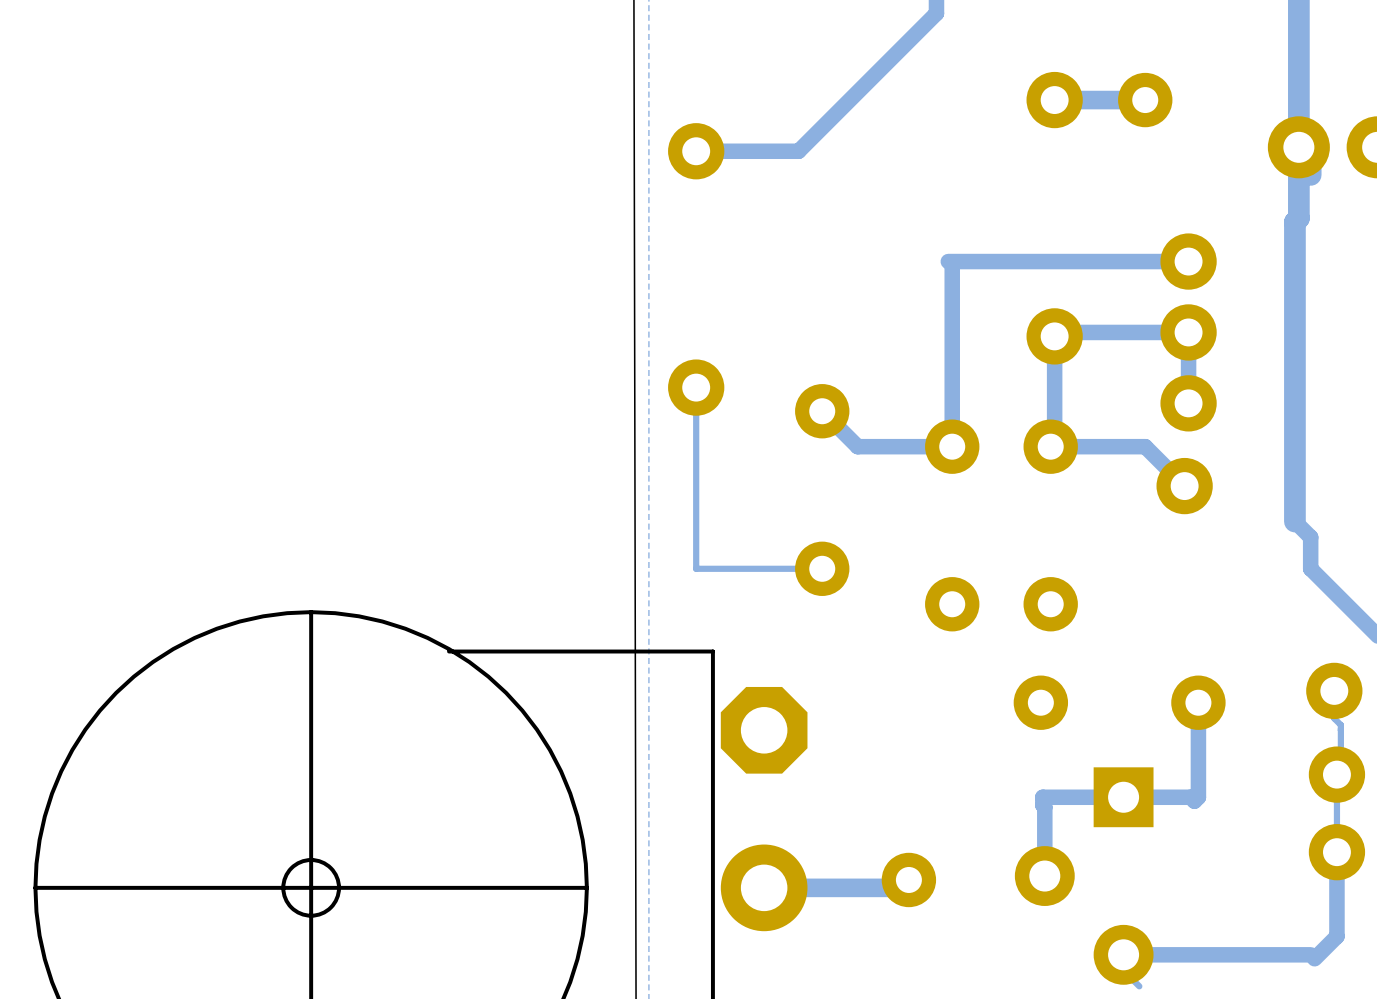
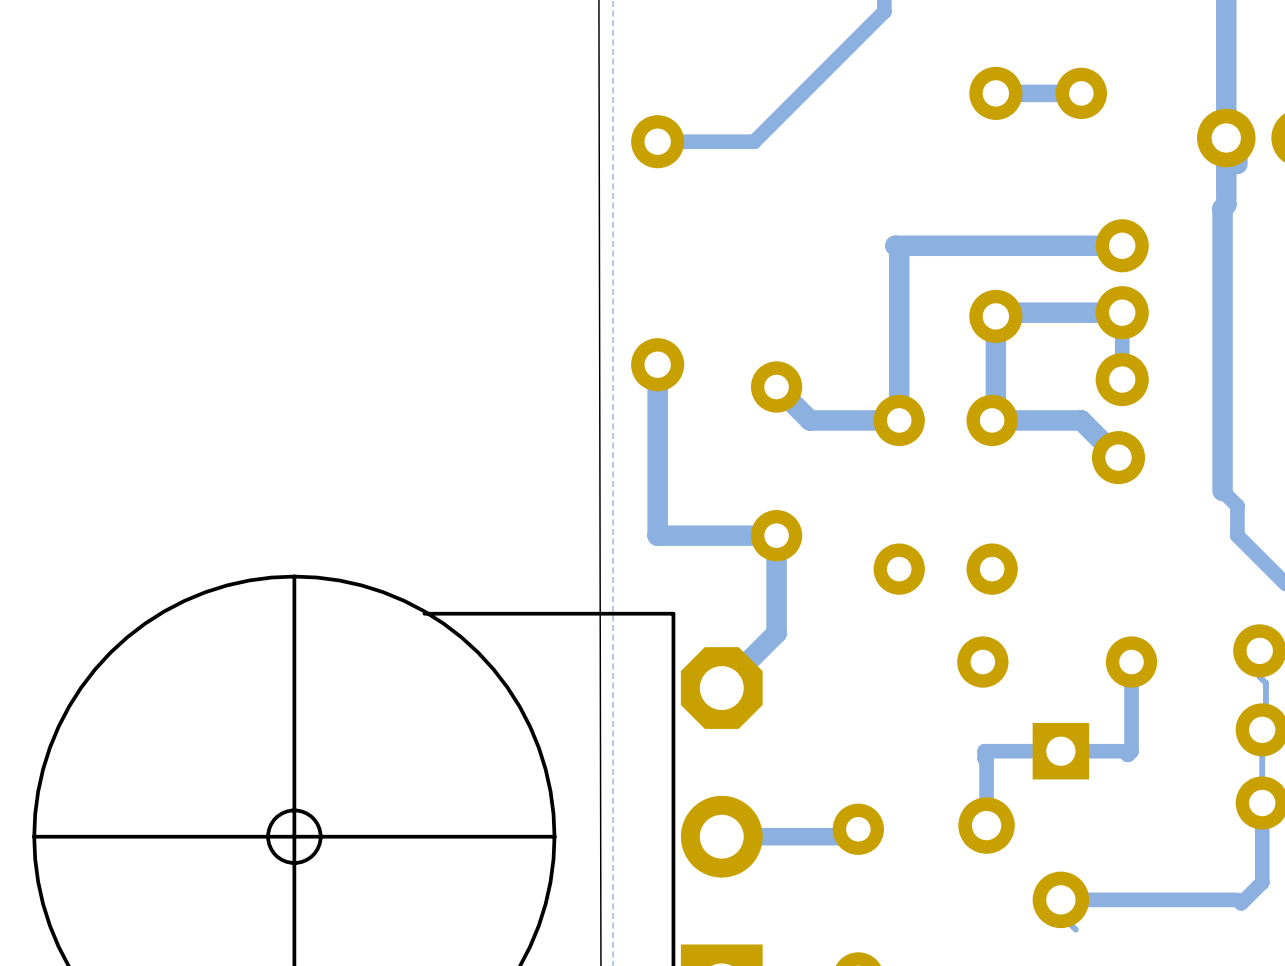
bottom track width: thin (1192, 257) (1188, 261) (948, 261) (952, 265) (952, 446) (857, 446) (822, 411) -> thick (1125, 242) (1122, 245) (895, 245) (899, 249) (899, 420) (810, 420) (776, 387)
bottom track width: thin (1192, 316) (1192, 328) (1188, 332) (1058, 332) (1054, 336) (1054, 442) (1050, 446) (1145, 446) (1184, 486) -> thick (1125, 297) (1125, 308) (1122, 312) (999, 312) (995, 316) (995, 416) (992, 420) (1081, 420) (1118, 457)
bottom track width: thin (696, 387) (696, 568) (822, 568) -> thick (657, 364) (657, 535) (776, 535)
bottom track: none -> (776, 535) (776, 633) (721, 688)

